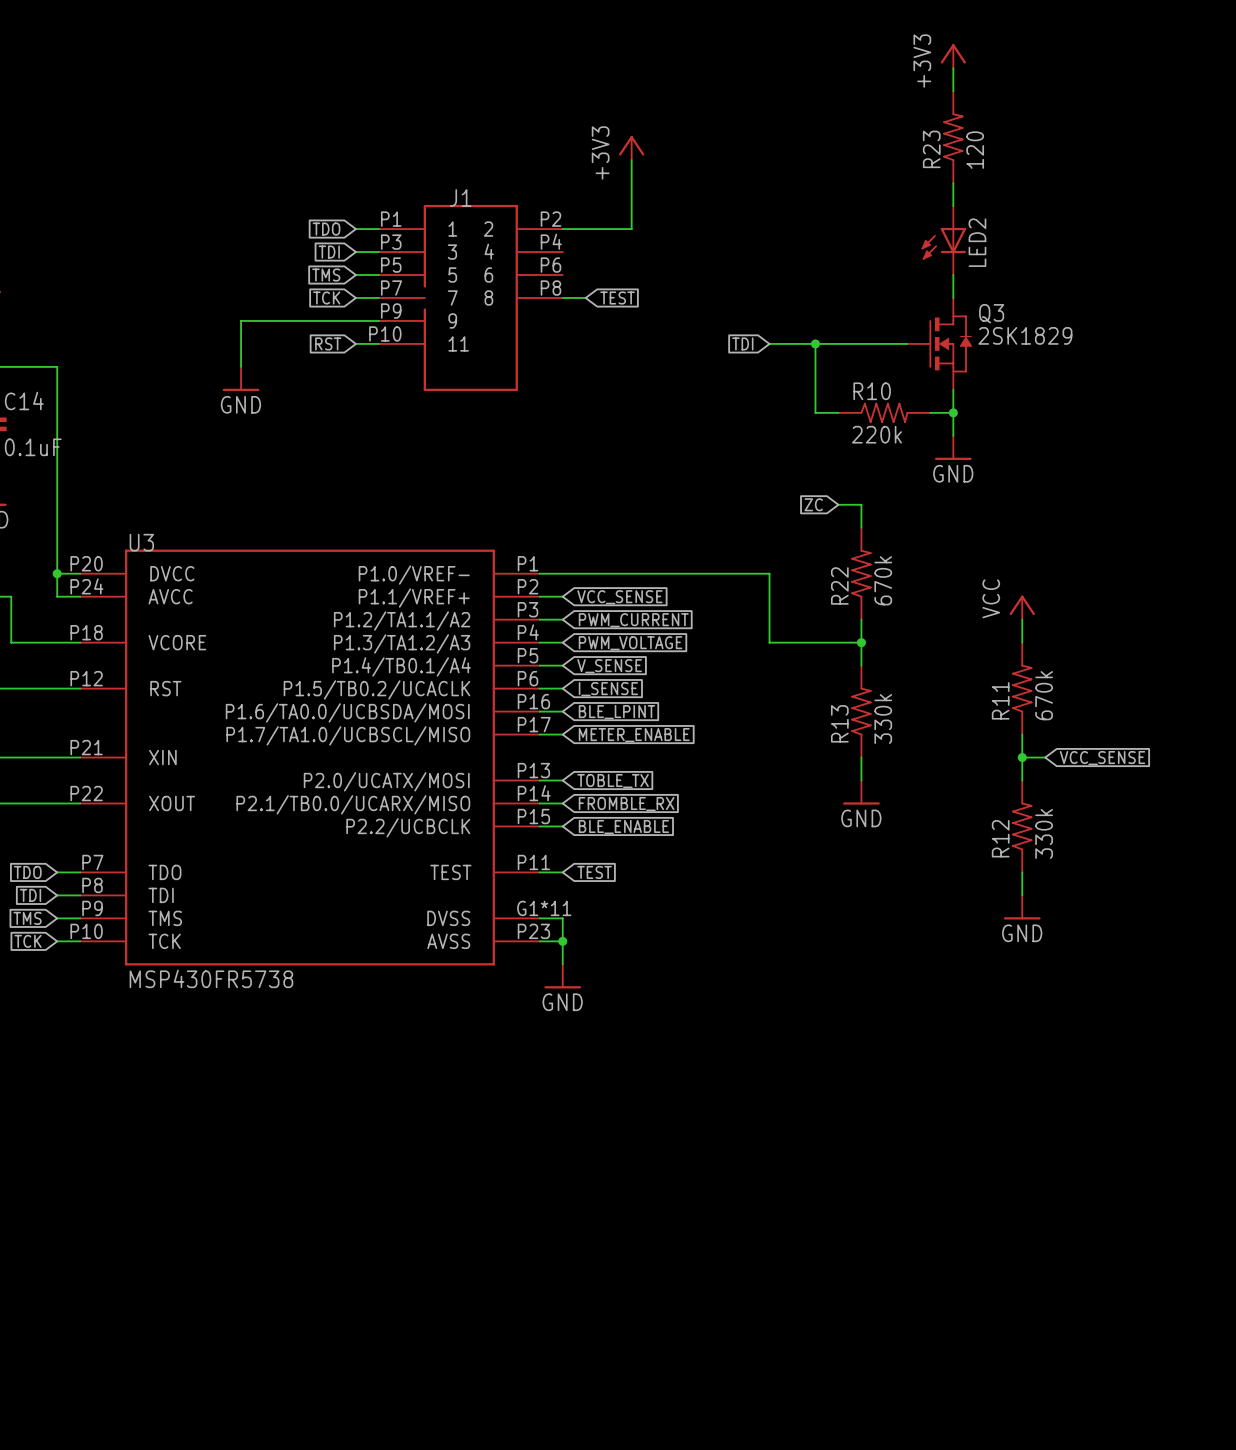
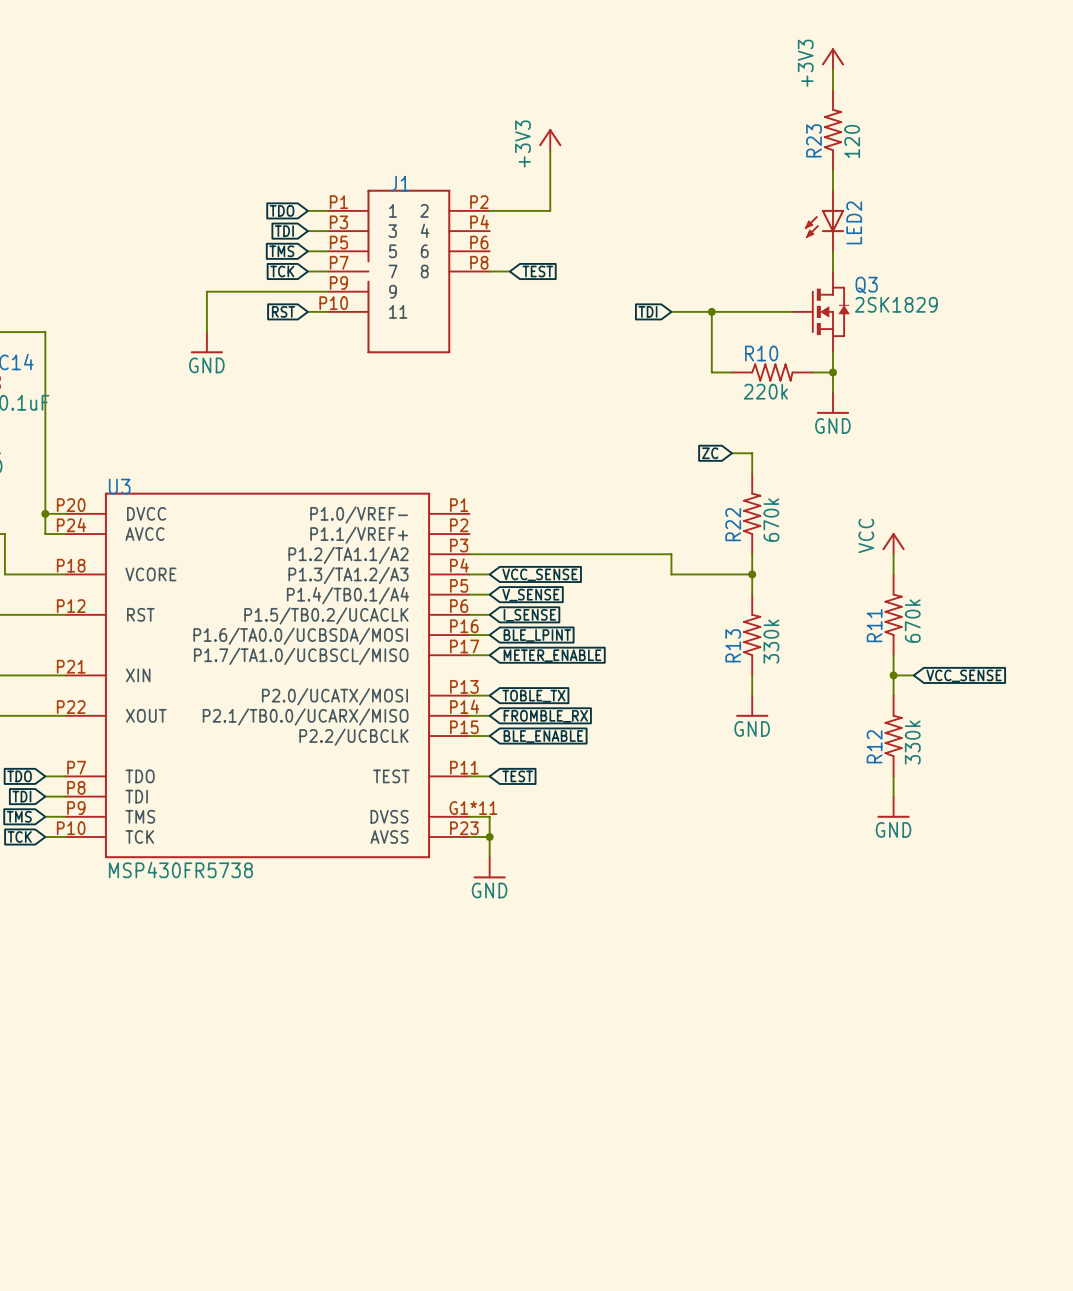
wire: (539, 573) (769, 573) (769, 619) -> (489, 554) (671, 554)
wire: (539, 596) (562, 596) -> none
global label: VCC_SENSE (619, 597) -> none
global label: PWM_CURRENT (633, 620) -> none
global label: PWM_VOLTAGE (630, 643) -> VCC_SENSE (539, 574)

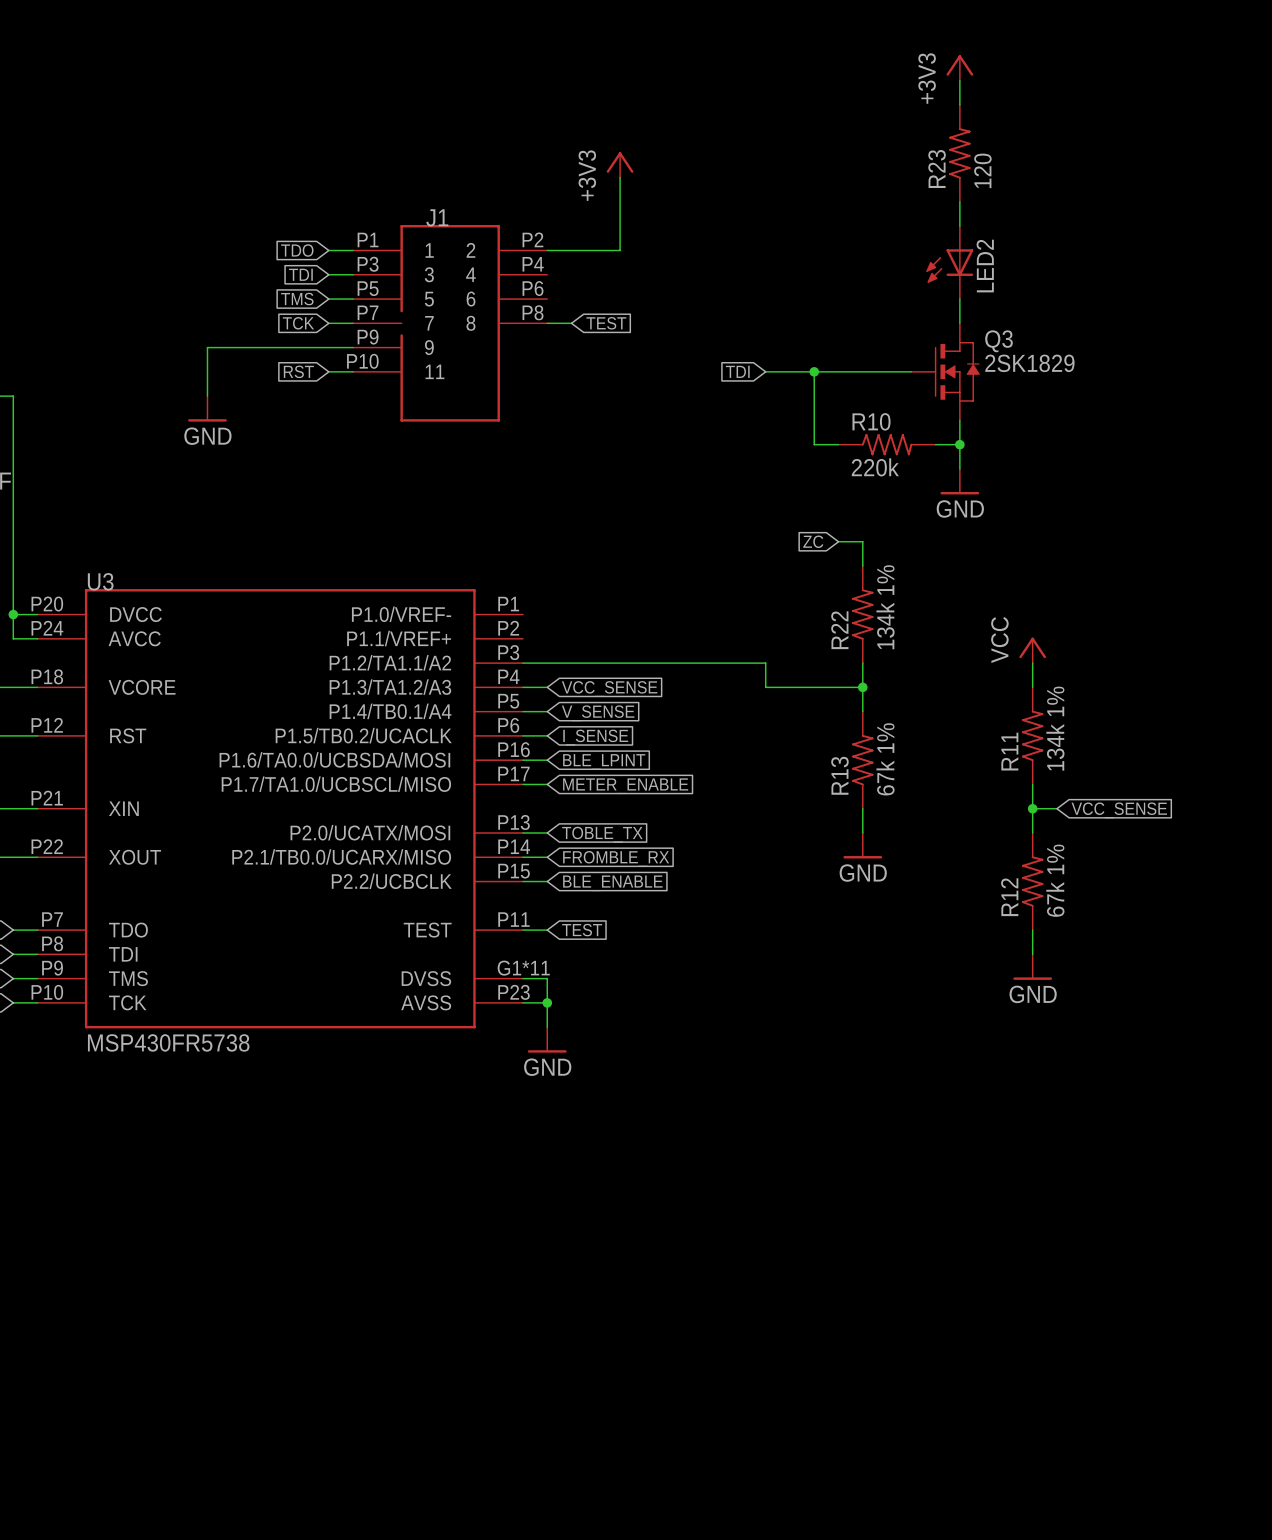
R22 value: 670k (771, 520) -> 134k 1% (885, 607)
R11 value: 670k (912, 621) -> 134k 1% (1055, 728)
R13 value: 330k (771, 641) -> 67k 1% (885, 759)
R12 value: 330k (912, 742) -> 67k 1% (1055, 880)

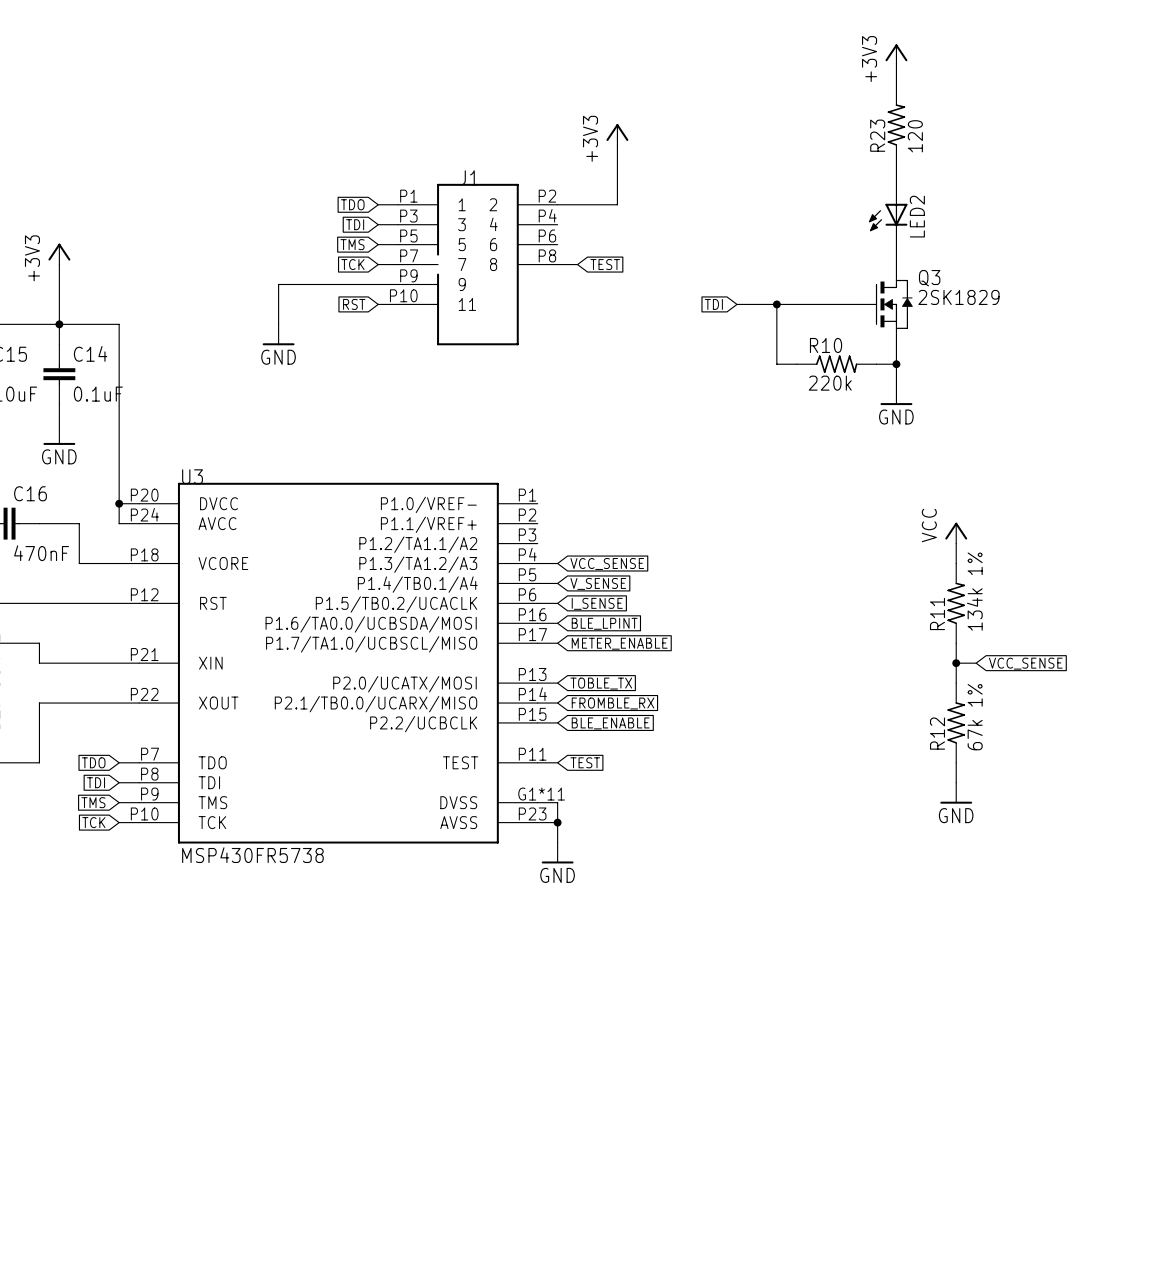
global label: ZC (813, 541) -> none
wire: (838, 541) (862, 541) (862, 566) -> none
R22: 134k 1% (862, 614) -> none
wire: (522, 663) (765, 663) (765, 687) (862, 687) -> none
wire: (862, 663) (862, 711) -> none
junction: (862, 687) -> none
R13: 67k 1% (862, 760) -> none
wire: (862, 808) (862, 833) -> none
power symbol: GND (862, 845) -> none

